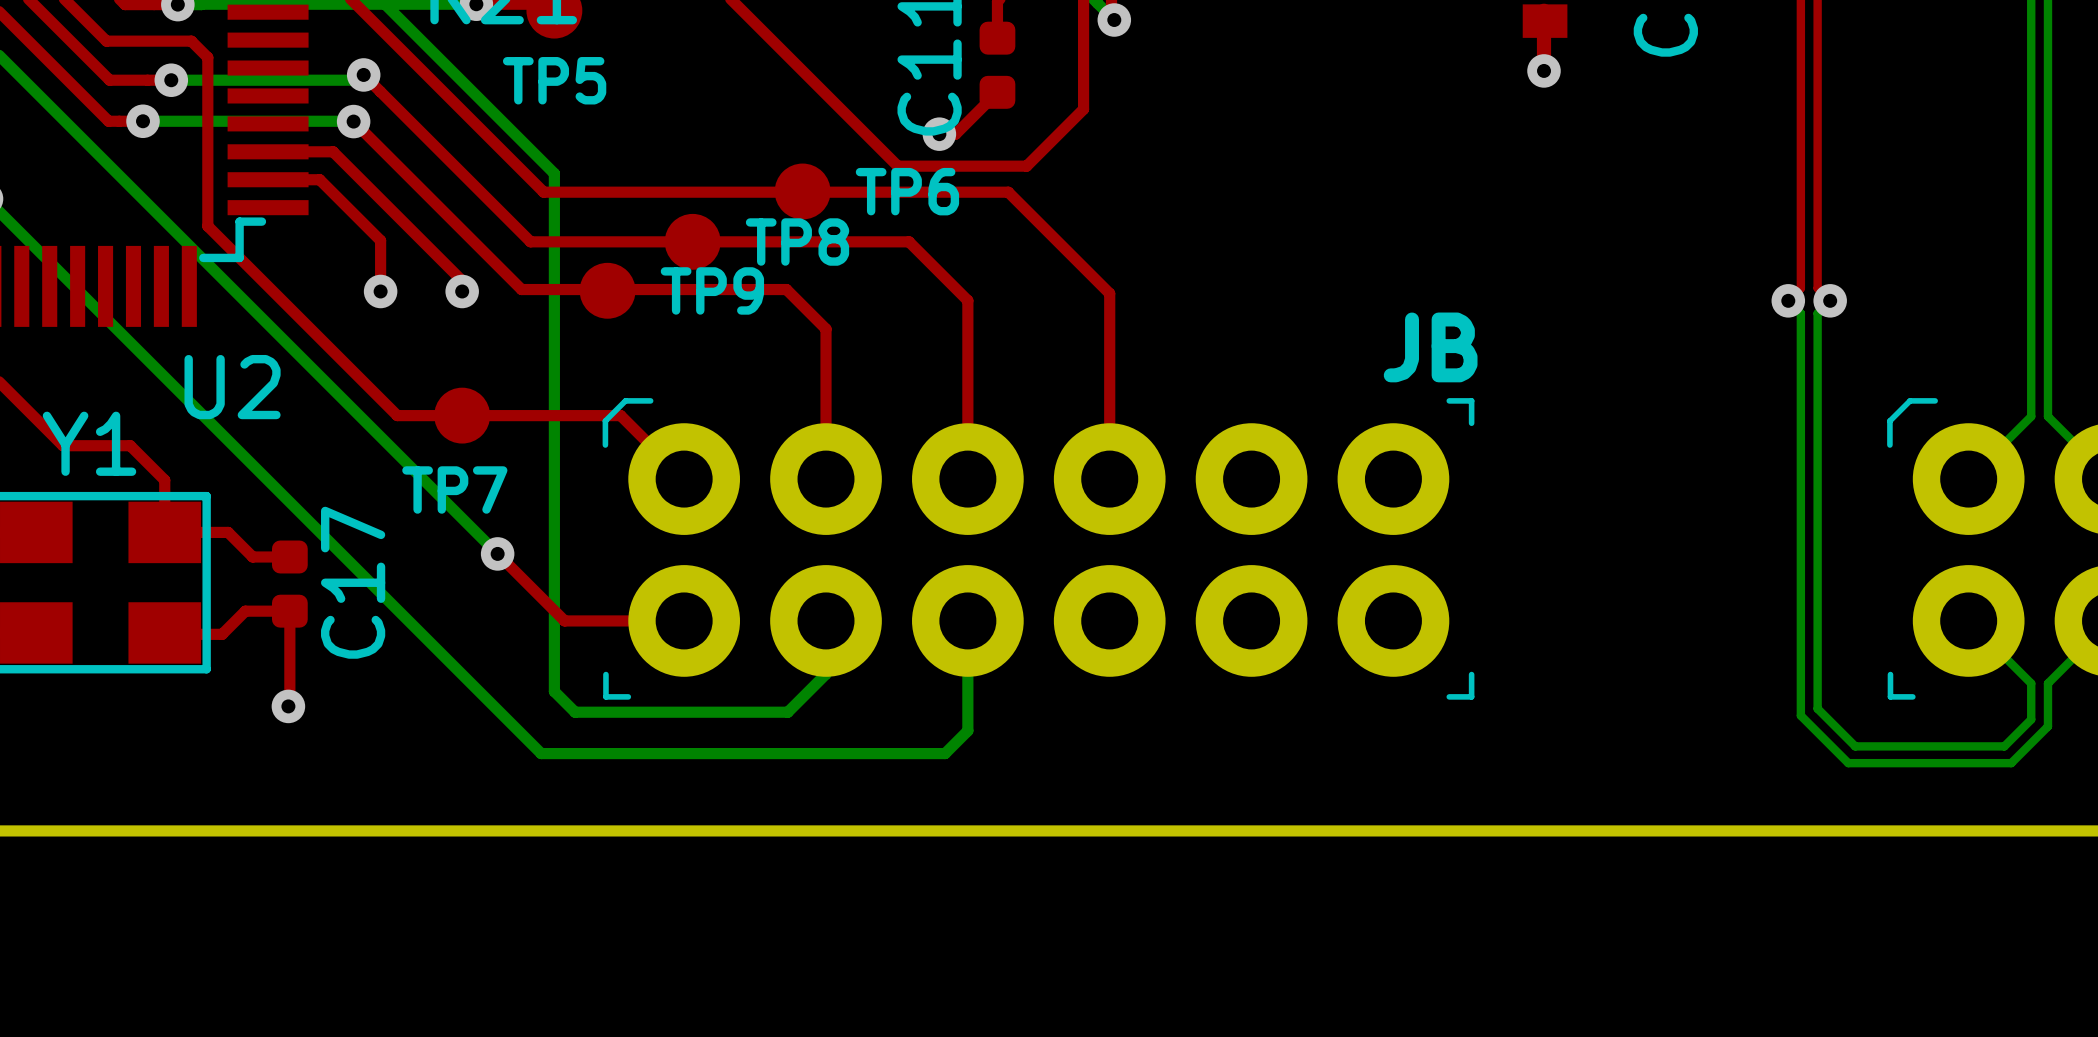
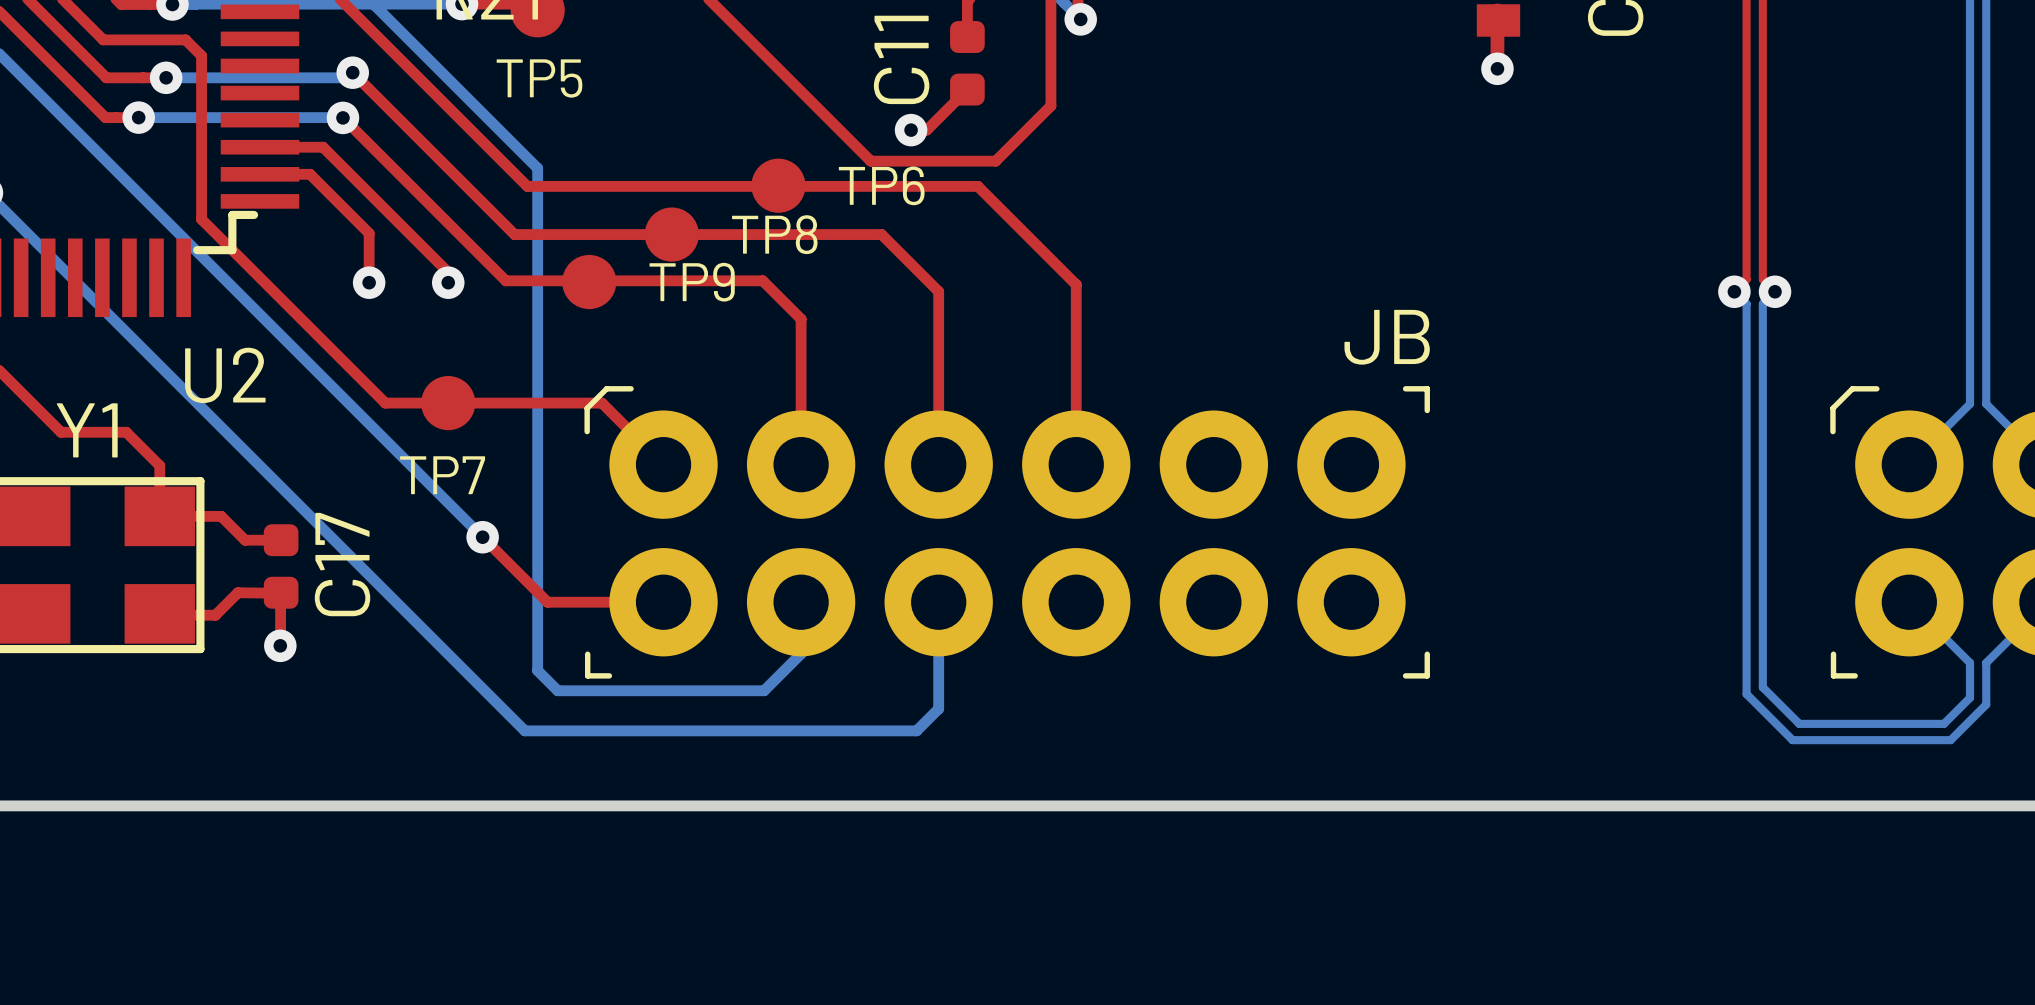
top track: (245, 611) (289, 611) (288, 706) -> (237, 592) (280, 593) (280, 645)
via position: (288, 706) -> (280, 645)

